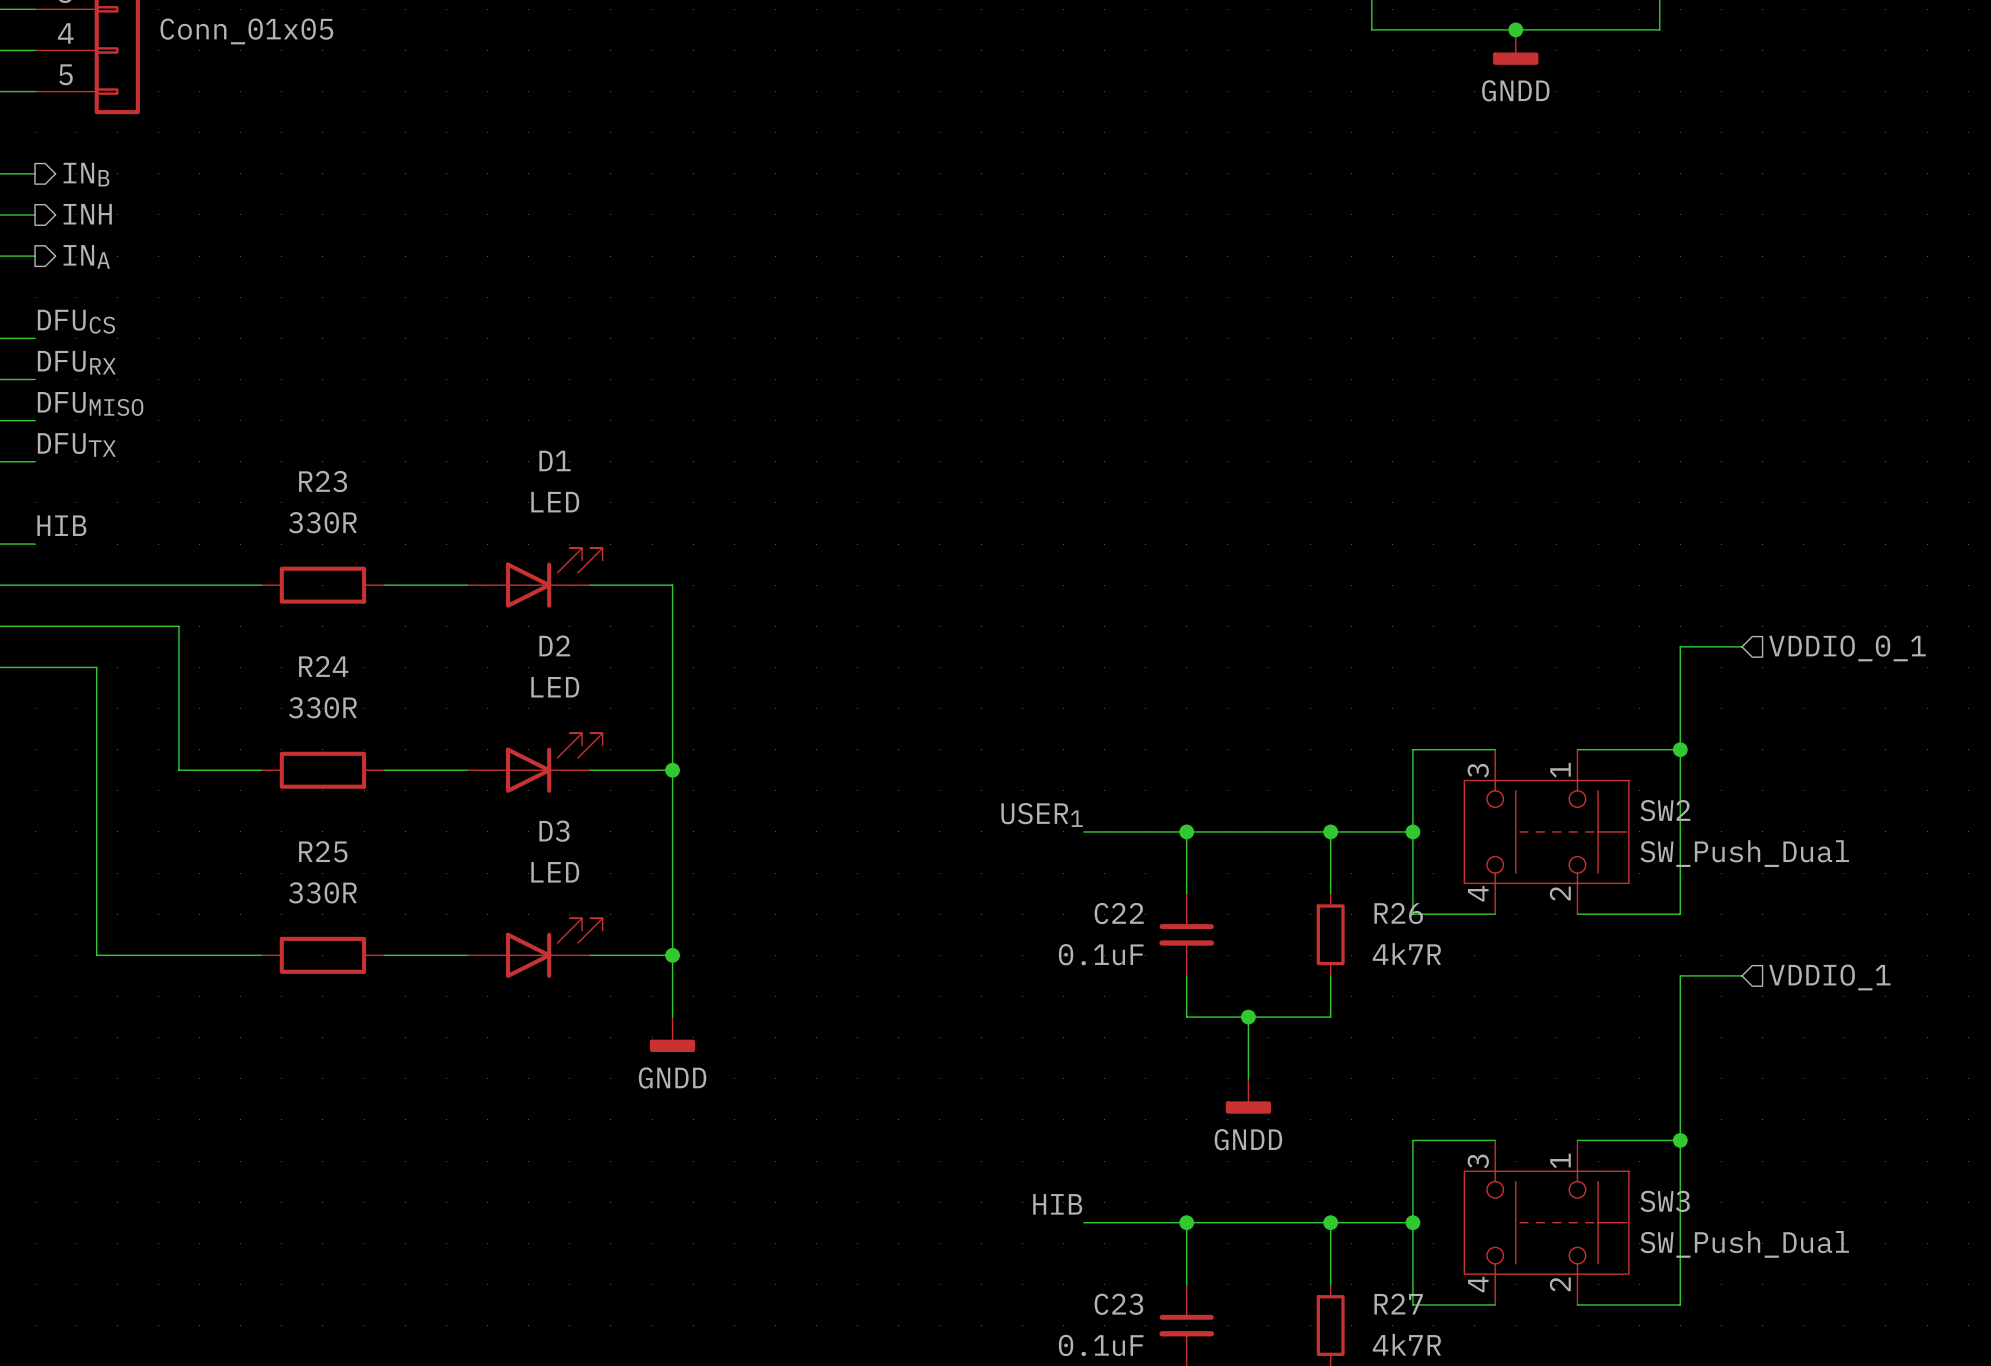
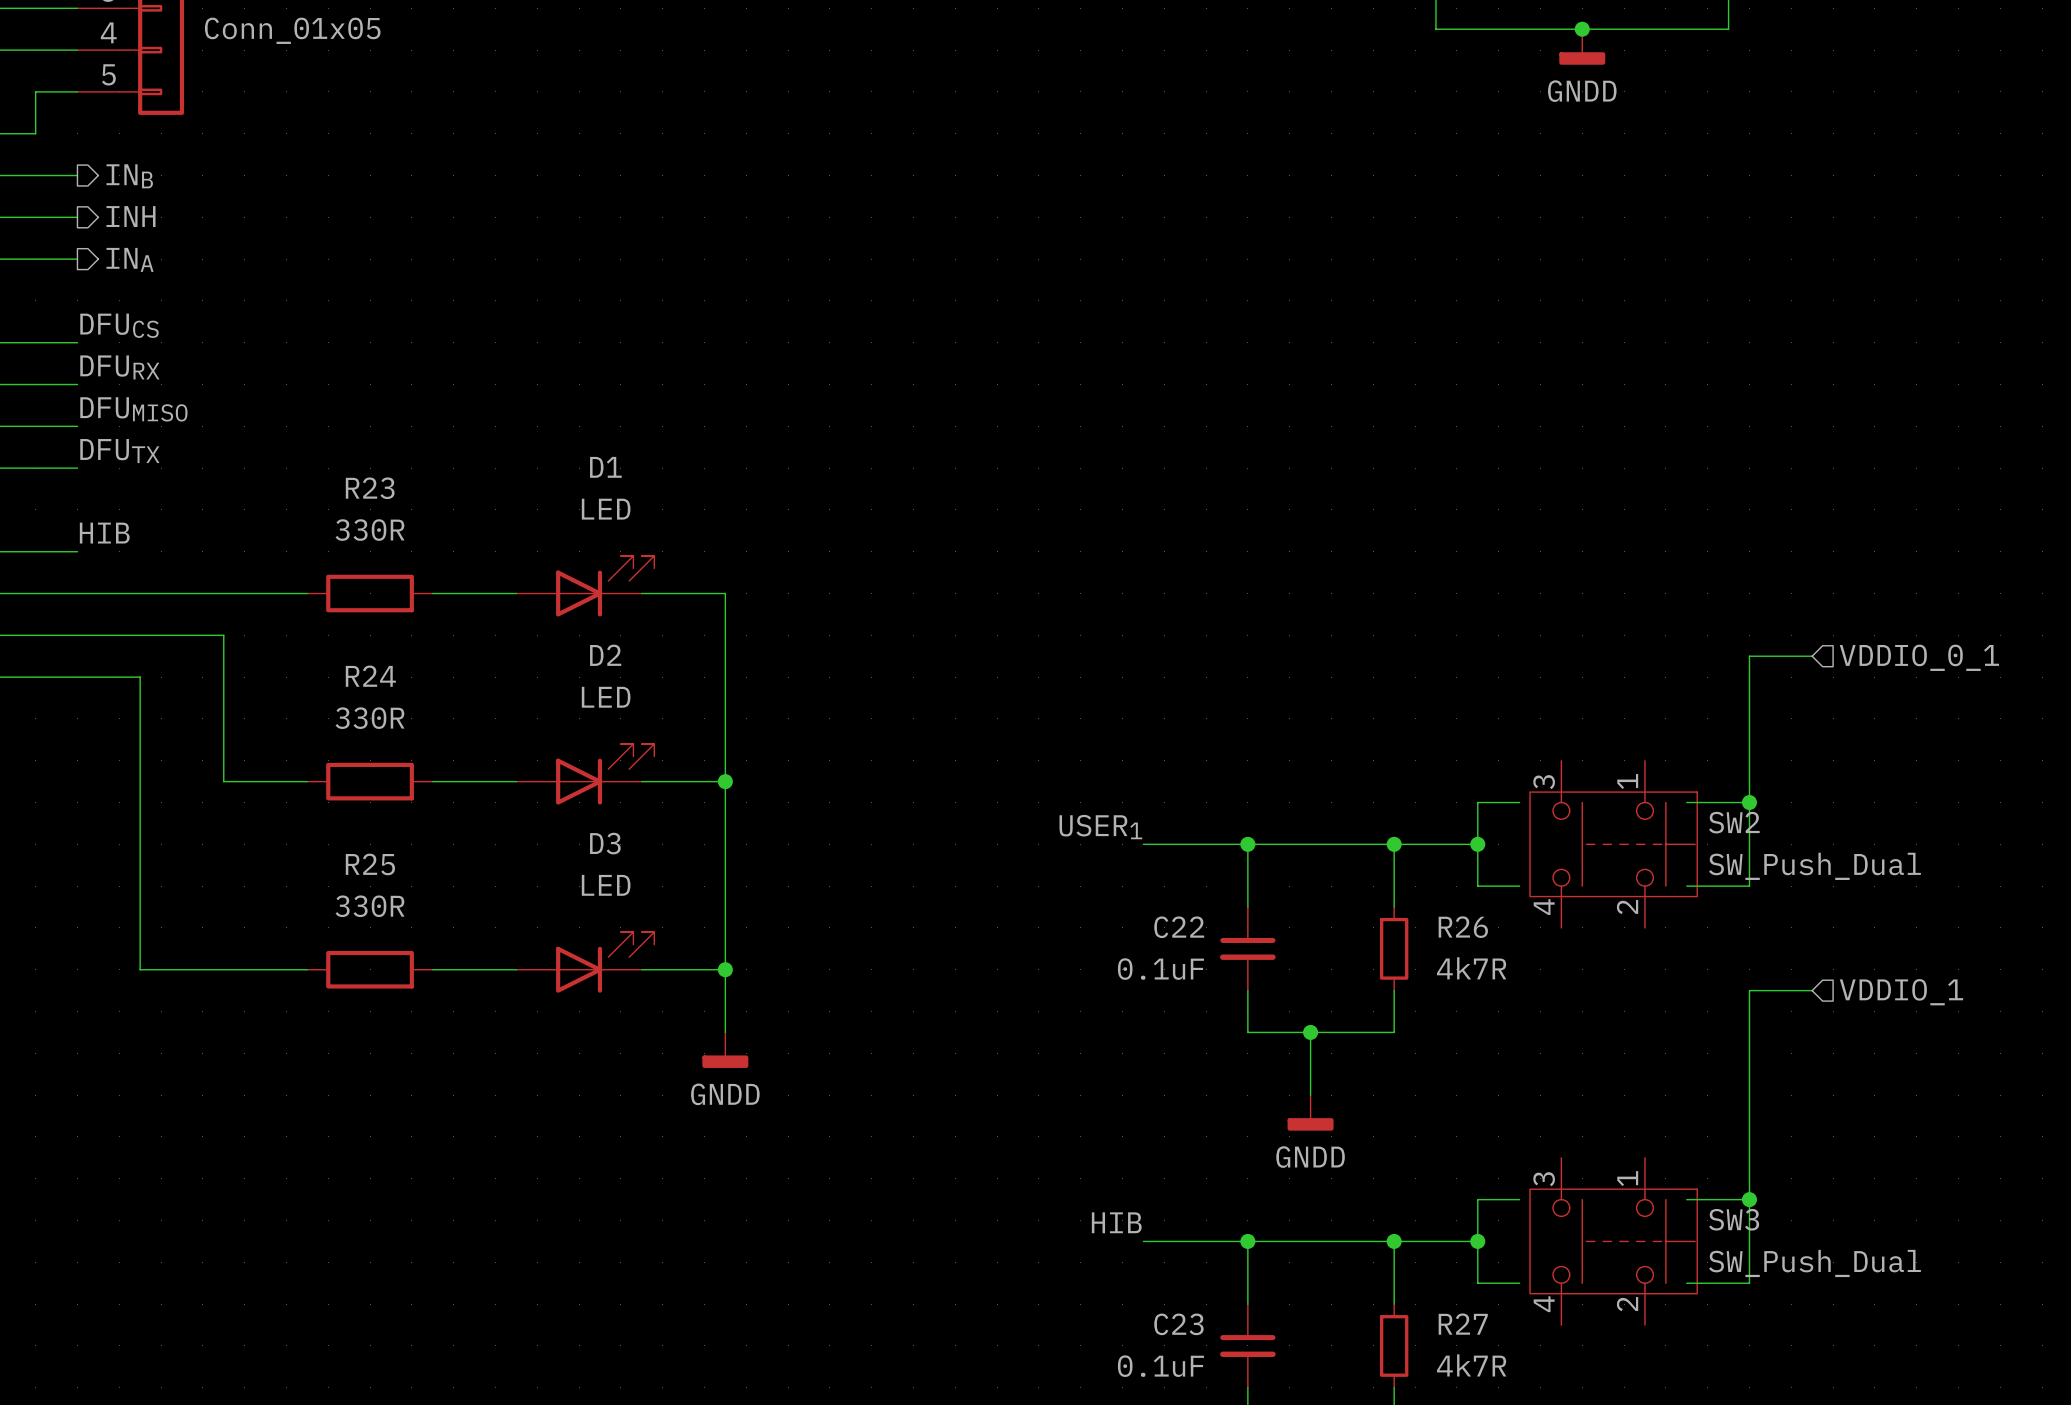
wire: (1495, 749) (1412, 749) (1412, 790) -> (1519, 802) (1477, 802)
wire: (1577, 749) (1680, 749) -> none
junction position: (1680, 749) -> (1749, 802)
wire: none -> (1686, 802) (1749, 802)
wire: (1412, 873) (1412, 914) (1495, 914) -> (1477, 886) (1519, 886)
wire: (1680, 873) (1680, 914) (1577, 914) -> (1749, 886) (1686, 886)
wire: (1495, 1140) (1412, 1140) (1412, 1181) -> (1519, 1199) (1477, 1199)
wire: (1577, 1140) (1680, 1140) -> none
junction position: (1680, 1140) -> (1749, 1199)
wire: none -> (1686, 1199) (1749, 1199)
wire: (1412, 1263) (1412, 1304) (1495, 1304) -> (1477, 1283) (1519, 1283)
wire: (1680, 1263) (1680, 1304) (1577, 1304) -> (1749, 1283) (1686, 1283)

